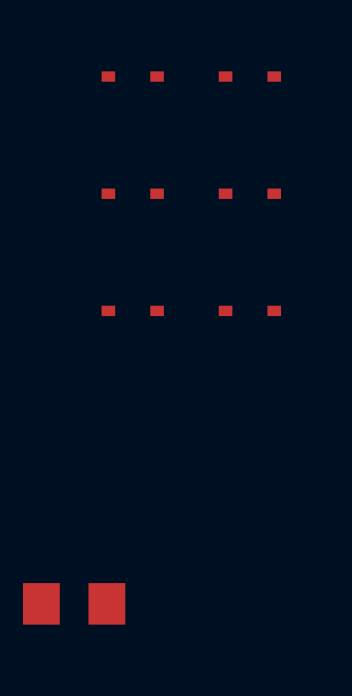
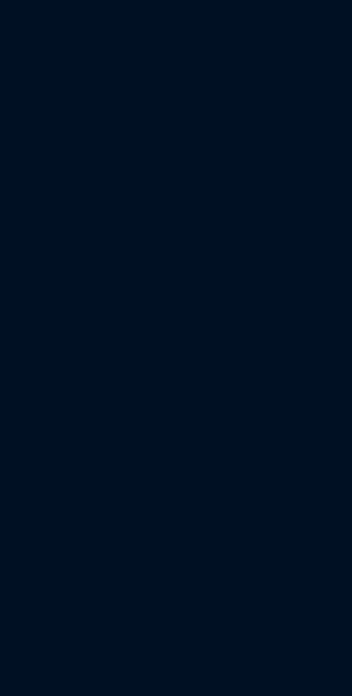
part: (132, 76) -> none
part: (249, 76) -> none
part: (132, 193) -> none
part: (249, 193) -> none
part: (132, 310) -> none
part: (249, 310) -> none
part: (74, 603) -> none

